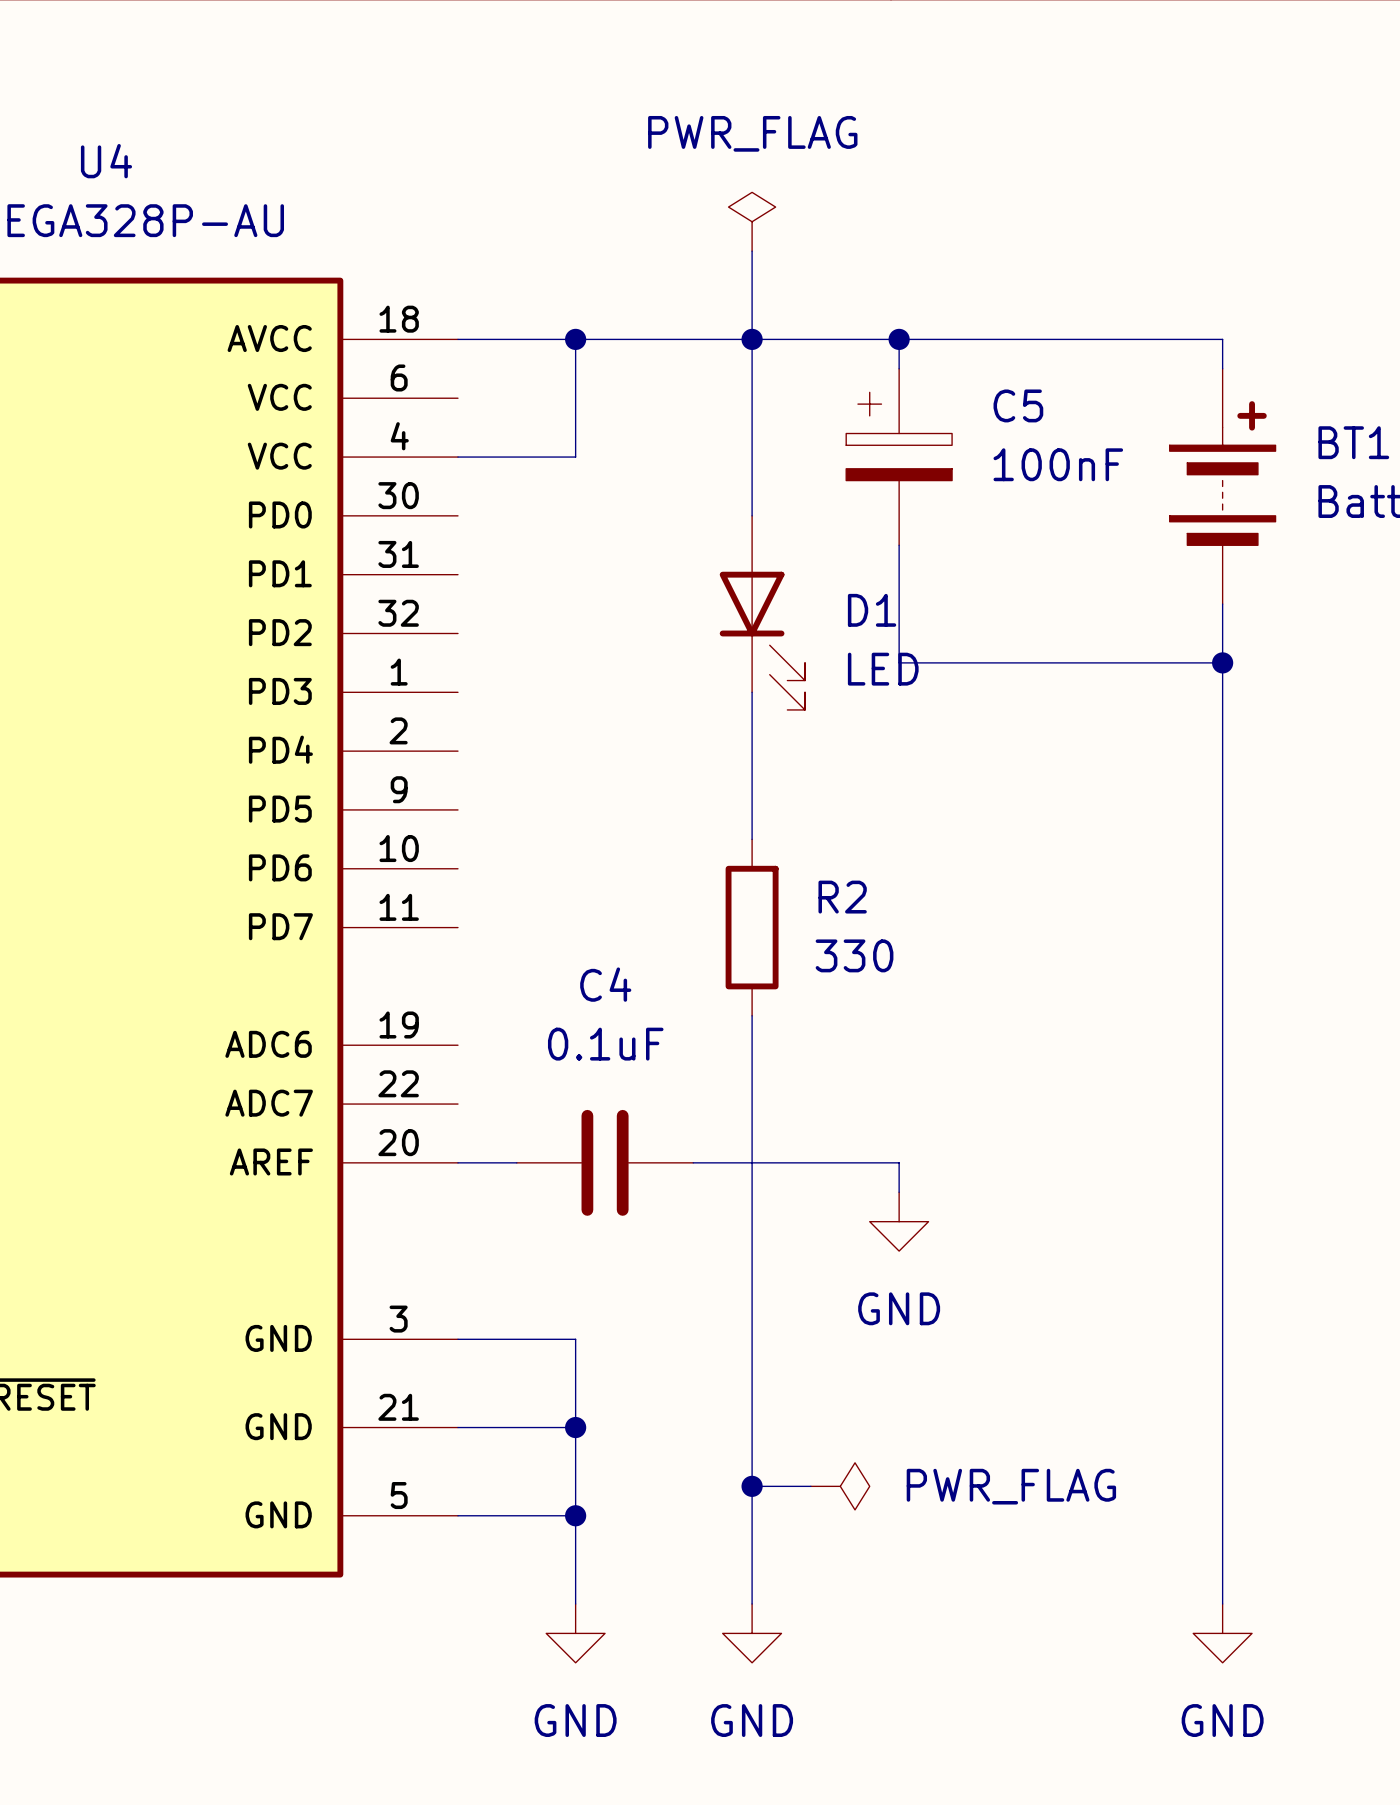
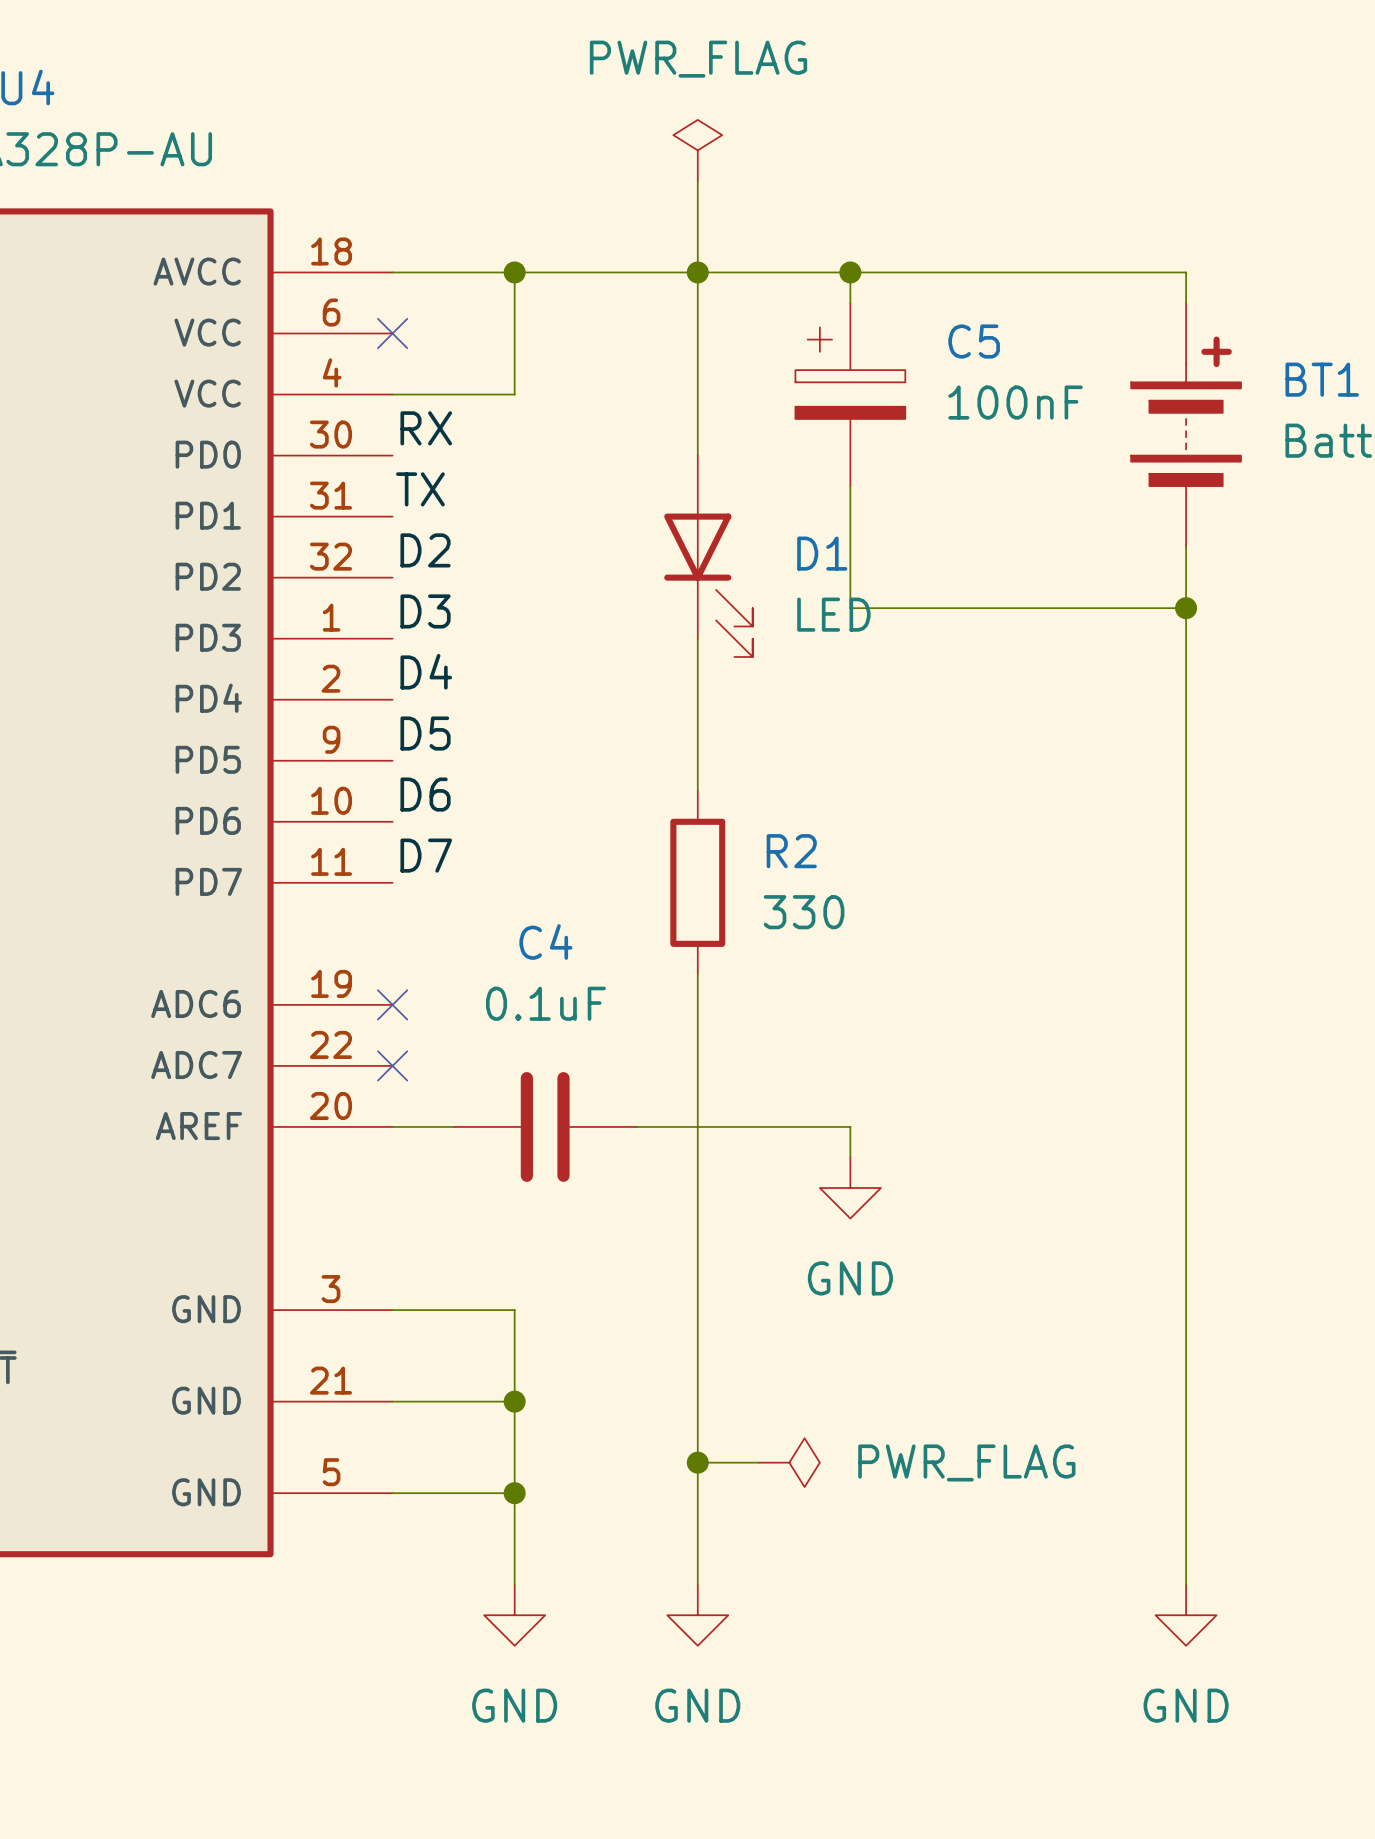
no-connect mark: none -> (392, 333)
label: none -> RX (426, 428)
label: none -> TX (420, 489)
label: none -> D2 (425, 550)
label: none -> D3 (425, 611)
label: none -> D4 (426, 671)
label: none -> D5 (425, 733)
label: none -> D6 (425, 794)
label: none -> D7 (426, 855)
no-connect mark: none -> (392, 1004)
no-connect mark: none -> (392, 1065)

